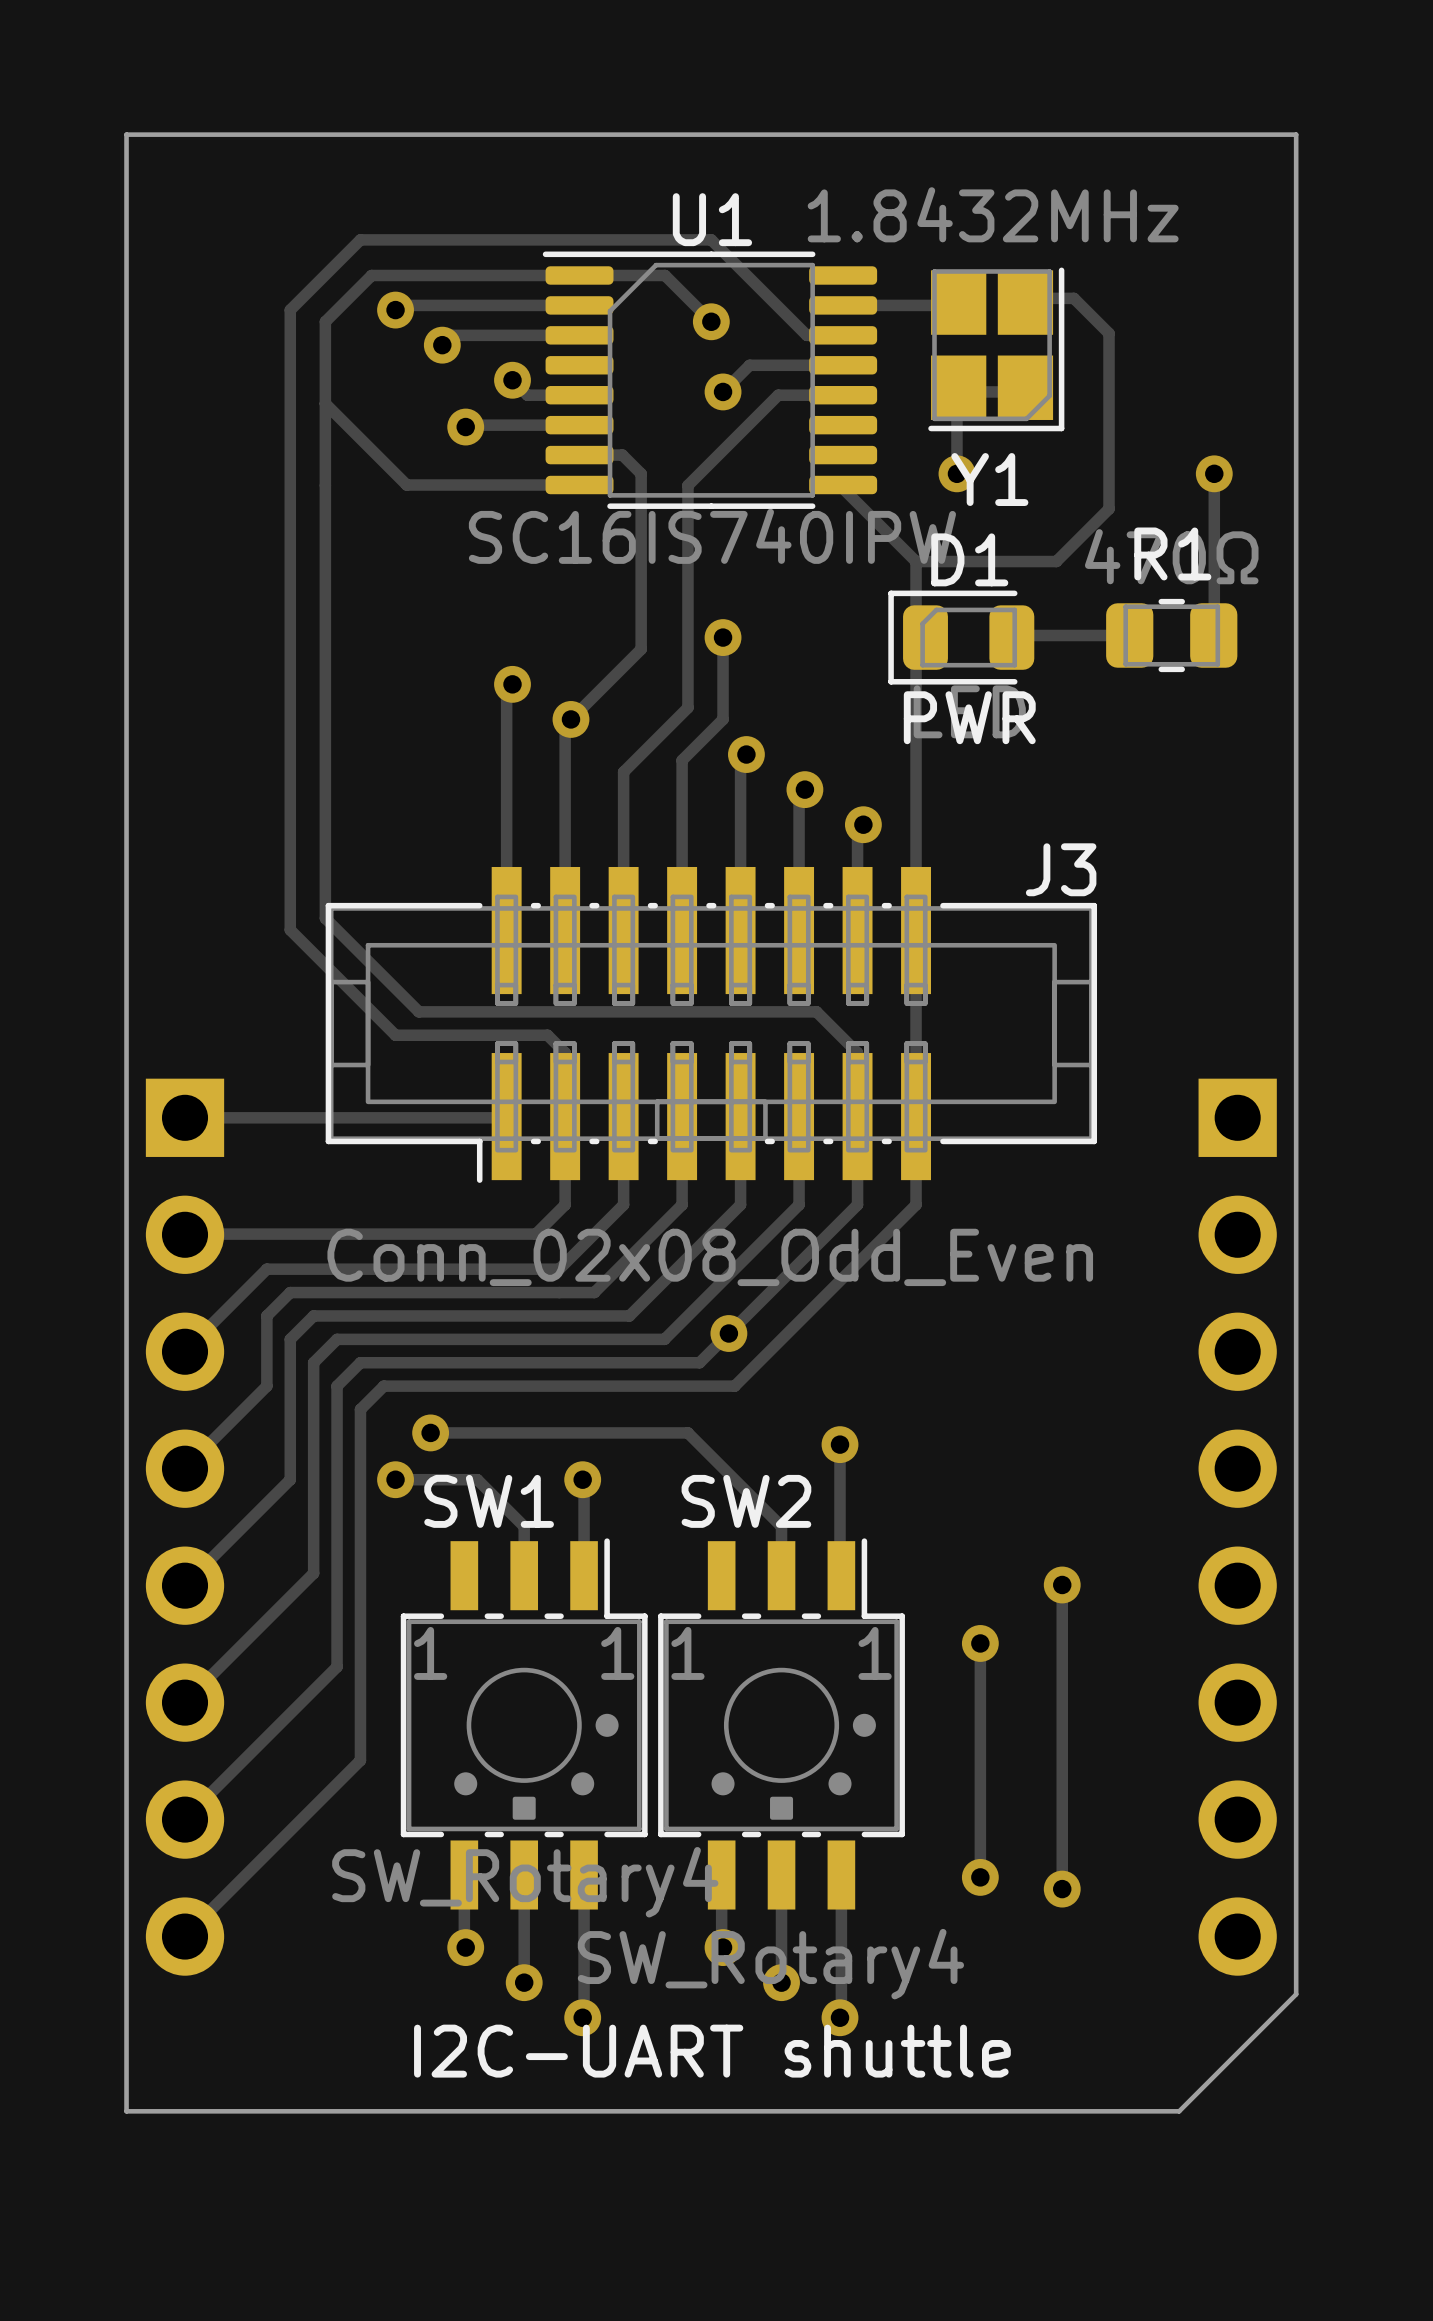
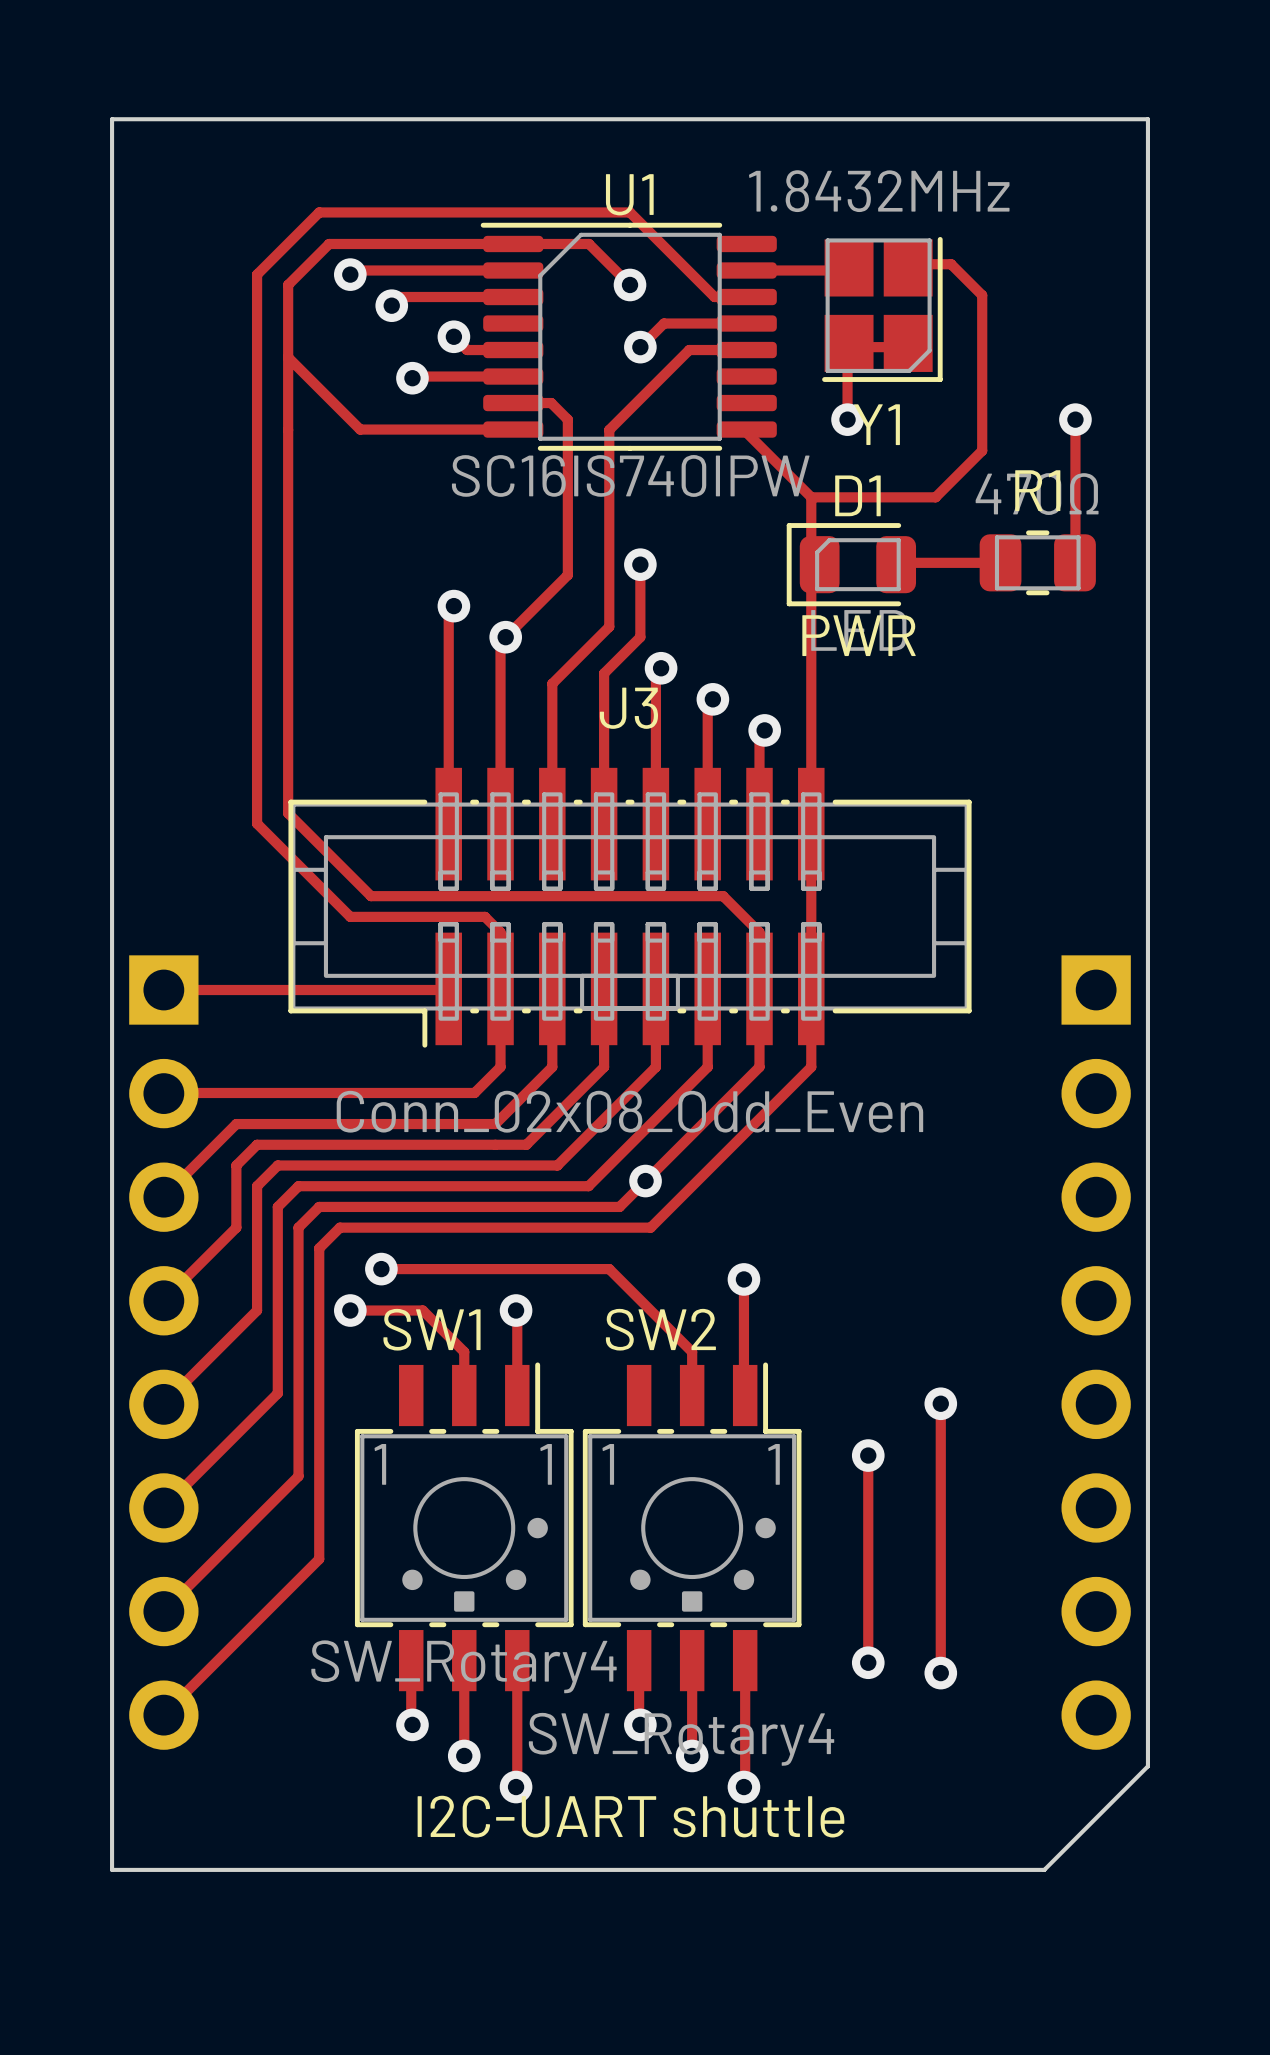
J3 name position: J3 (1061, 869) -> J3 (628, 708)

